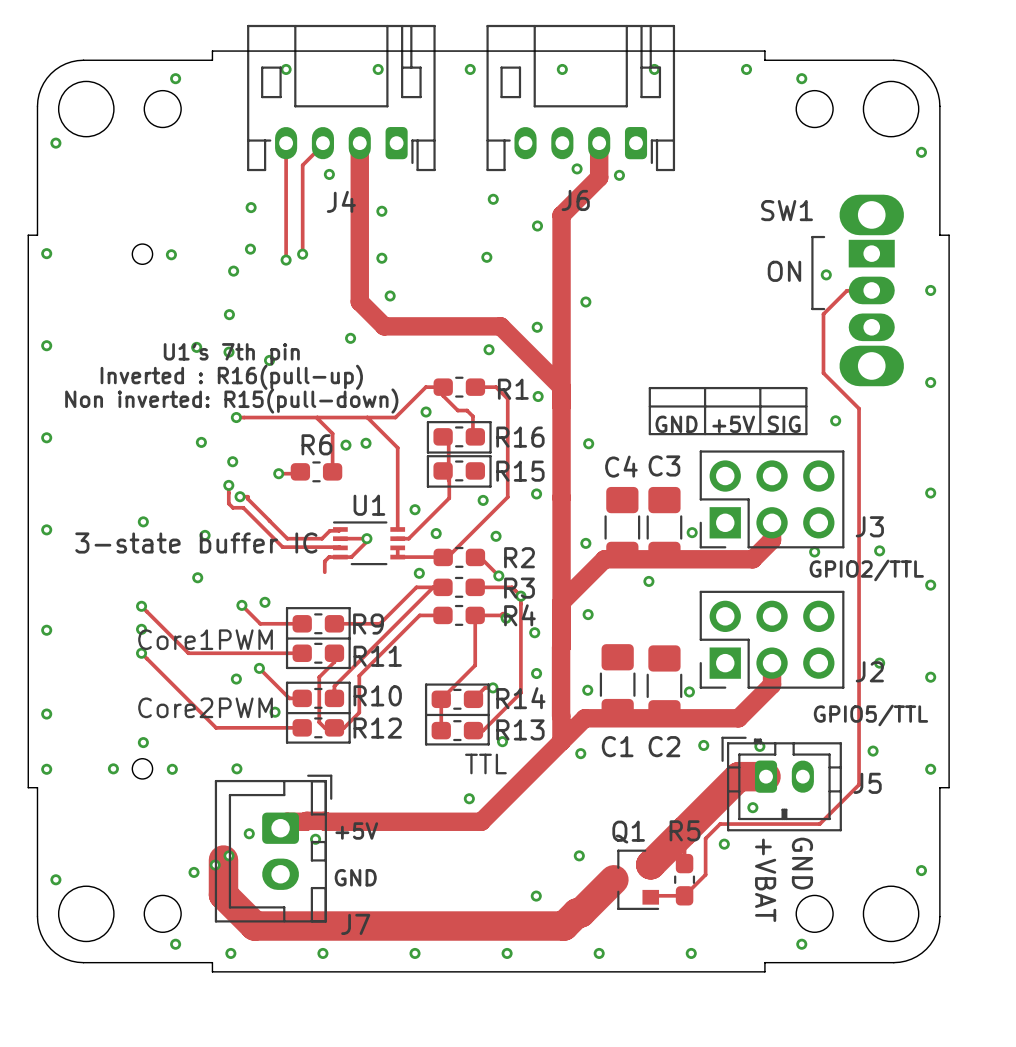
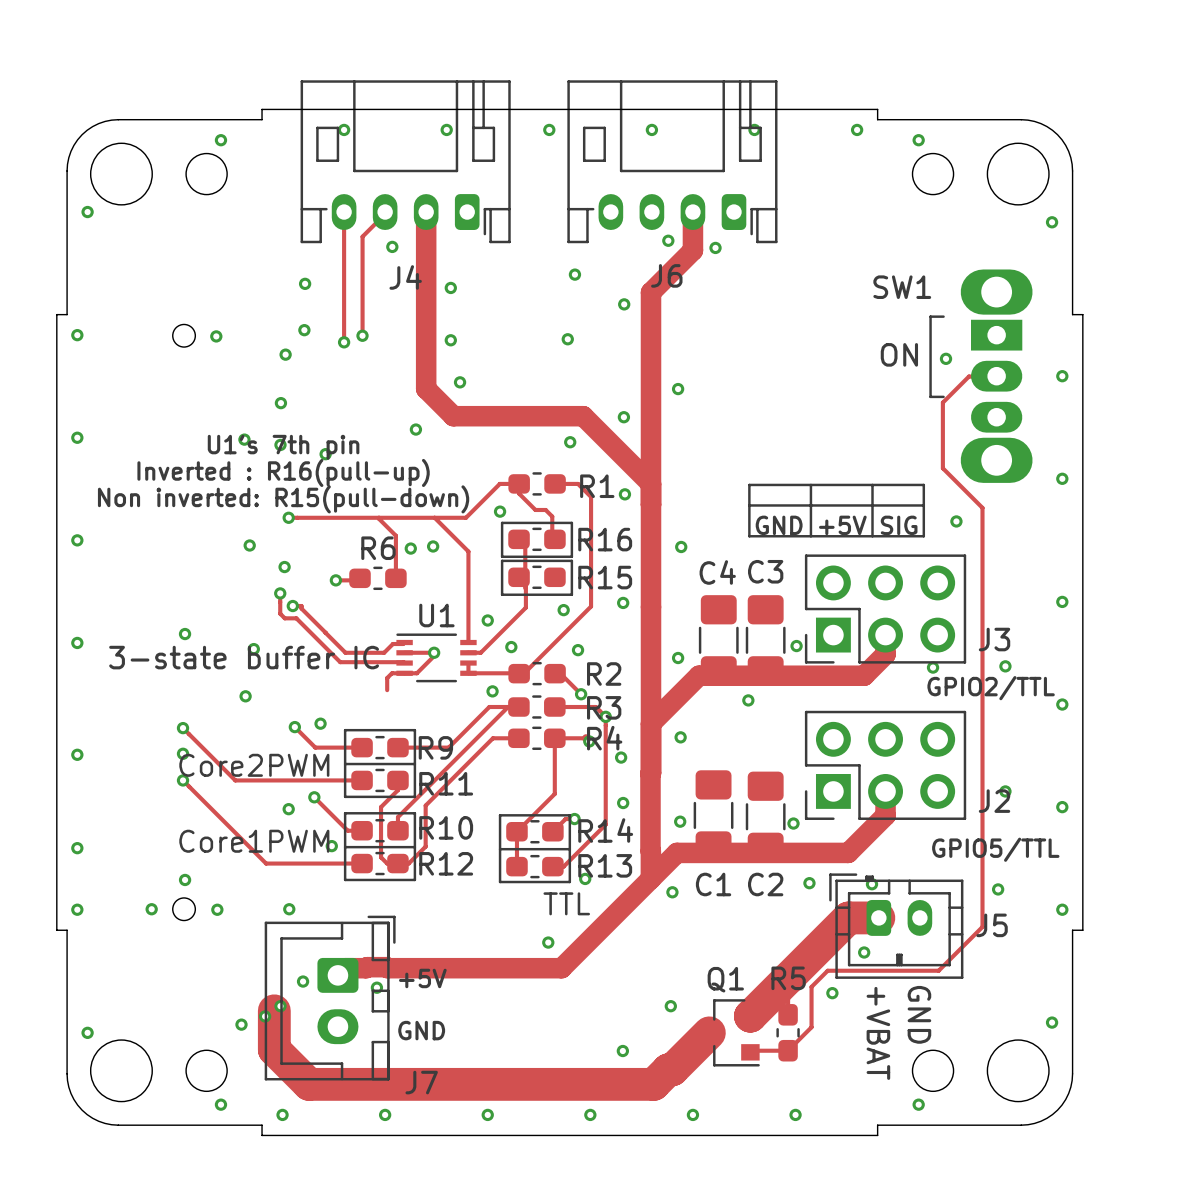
text: Core1PWM (205, 639) -> Core2PWM (254, 765)
text: Core2PWM (205, 707) -> Core1PWM (254, 841)

